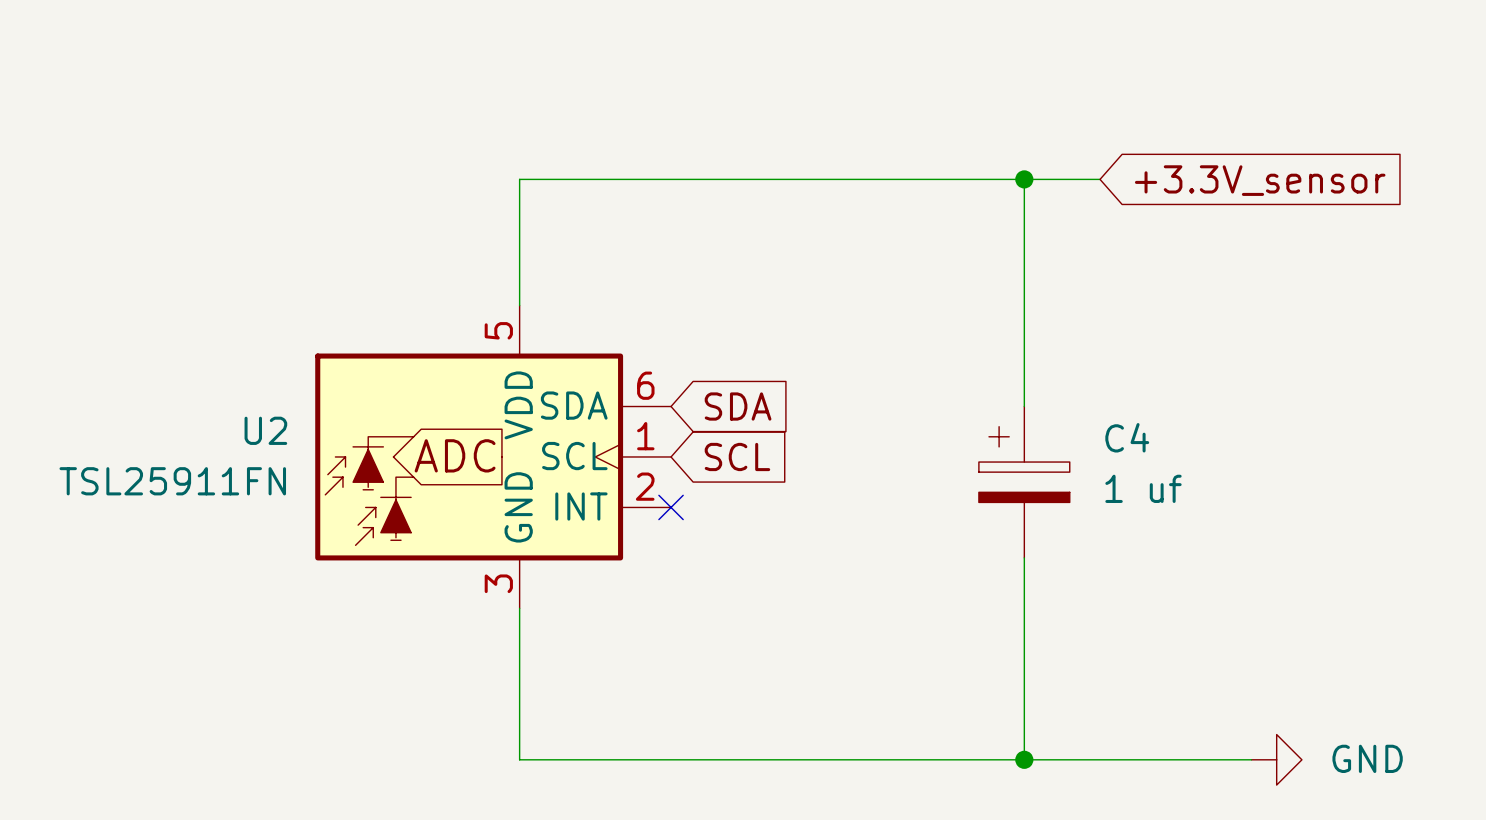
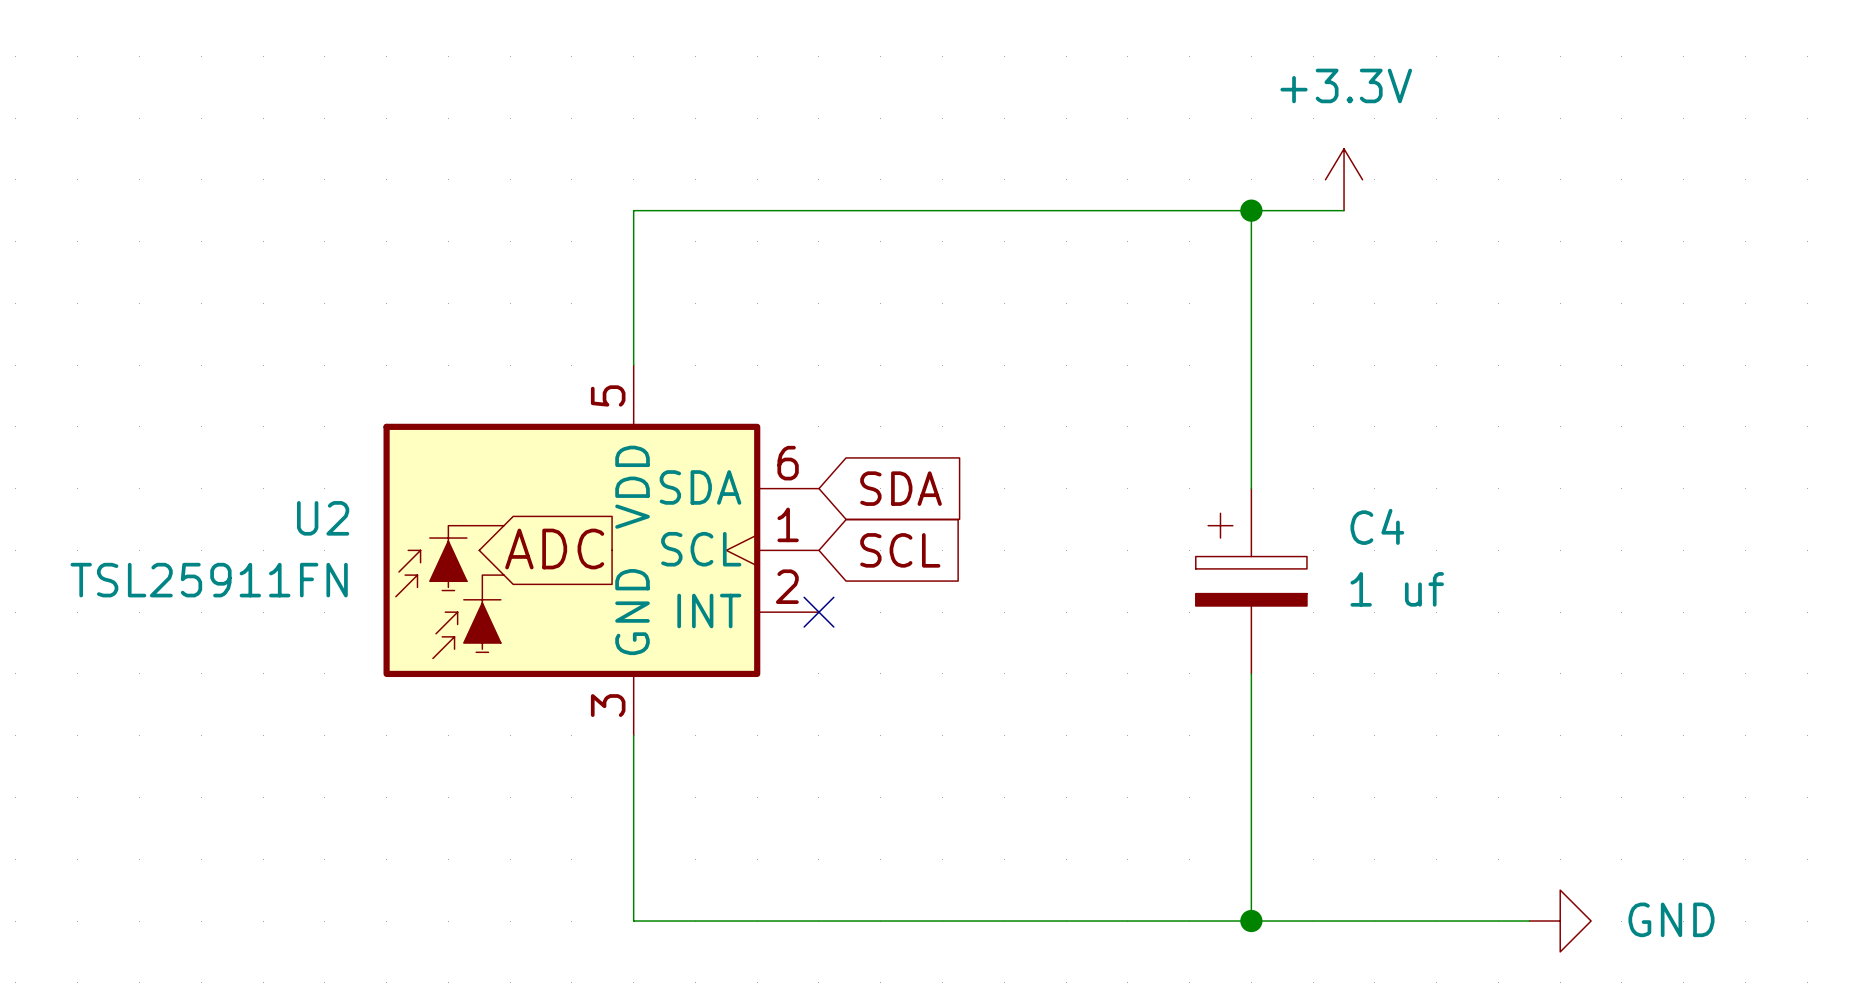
power symbol: none -> +3.3V (1344, 179)
global label: +3.3V_sensor (1260, 180) -> none

